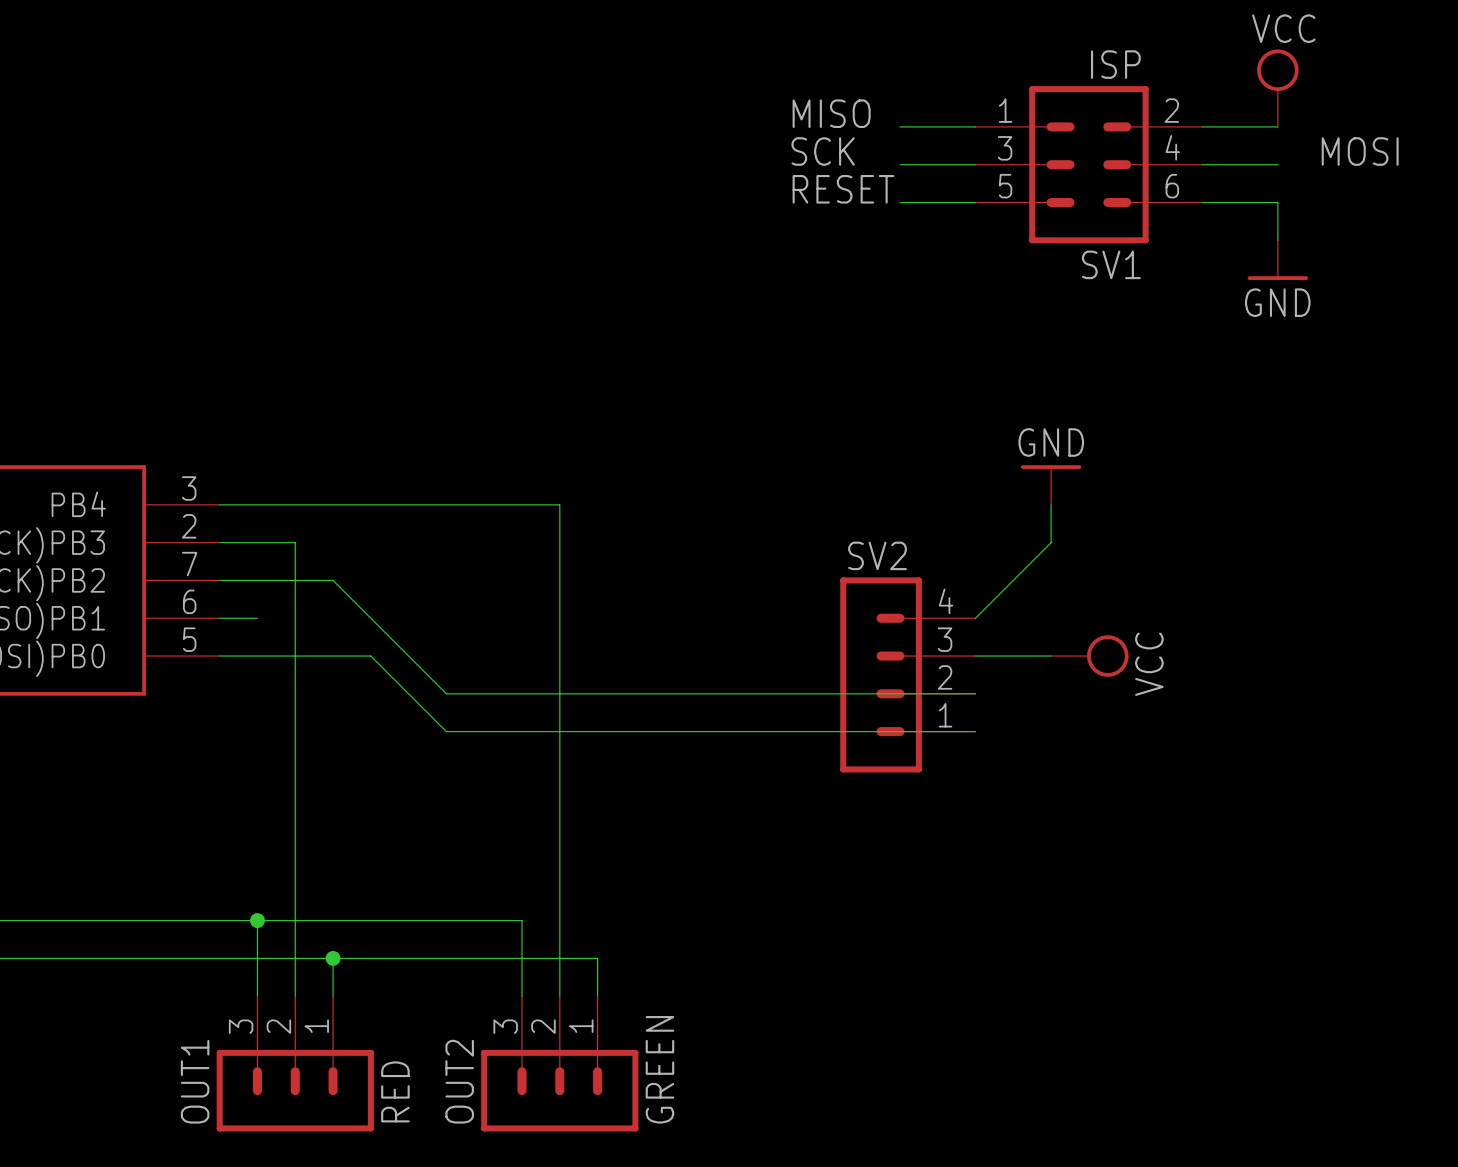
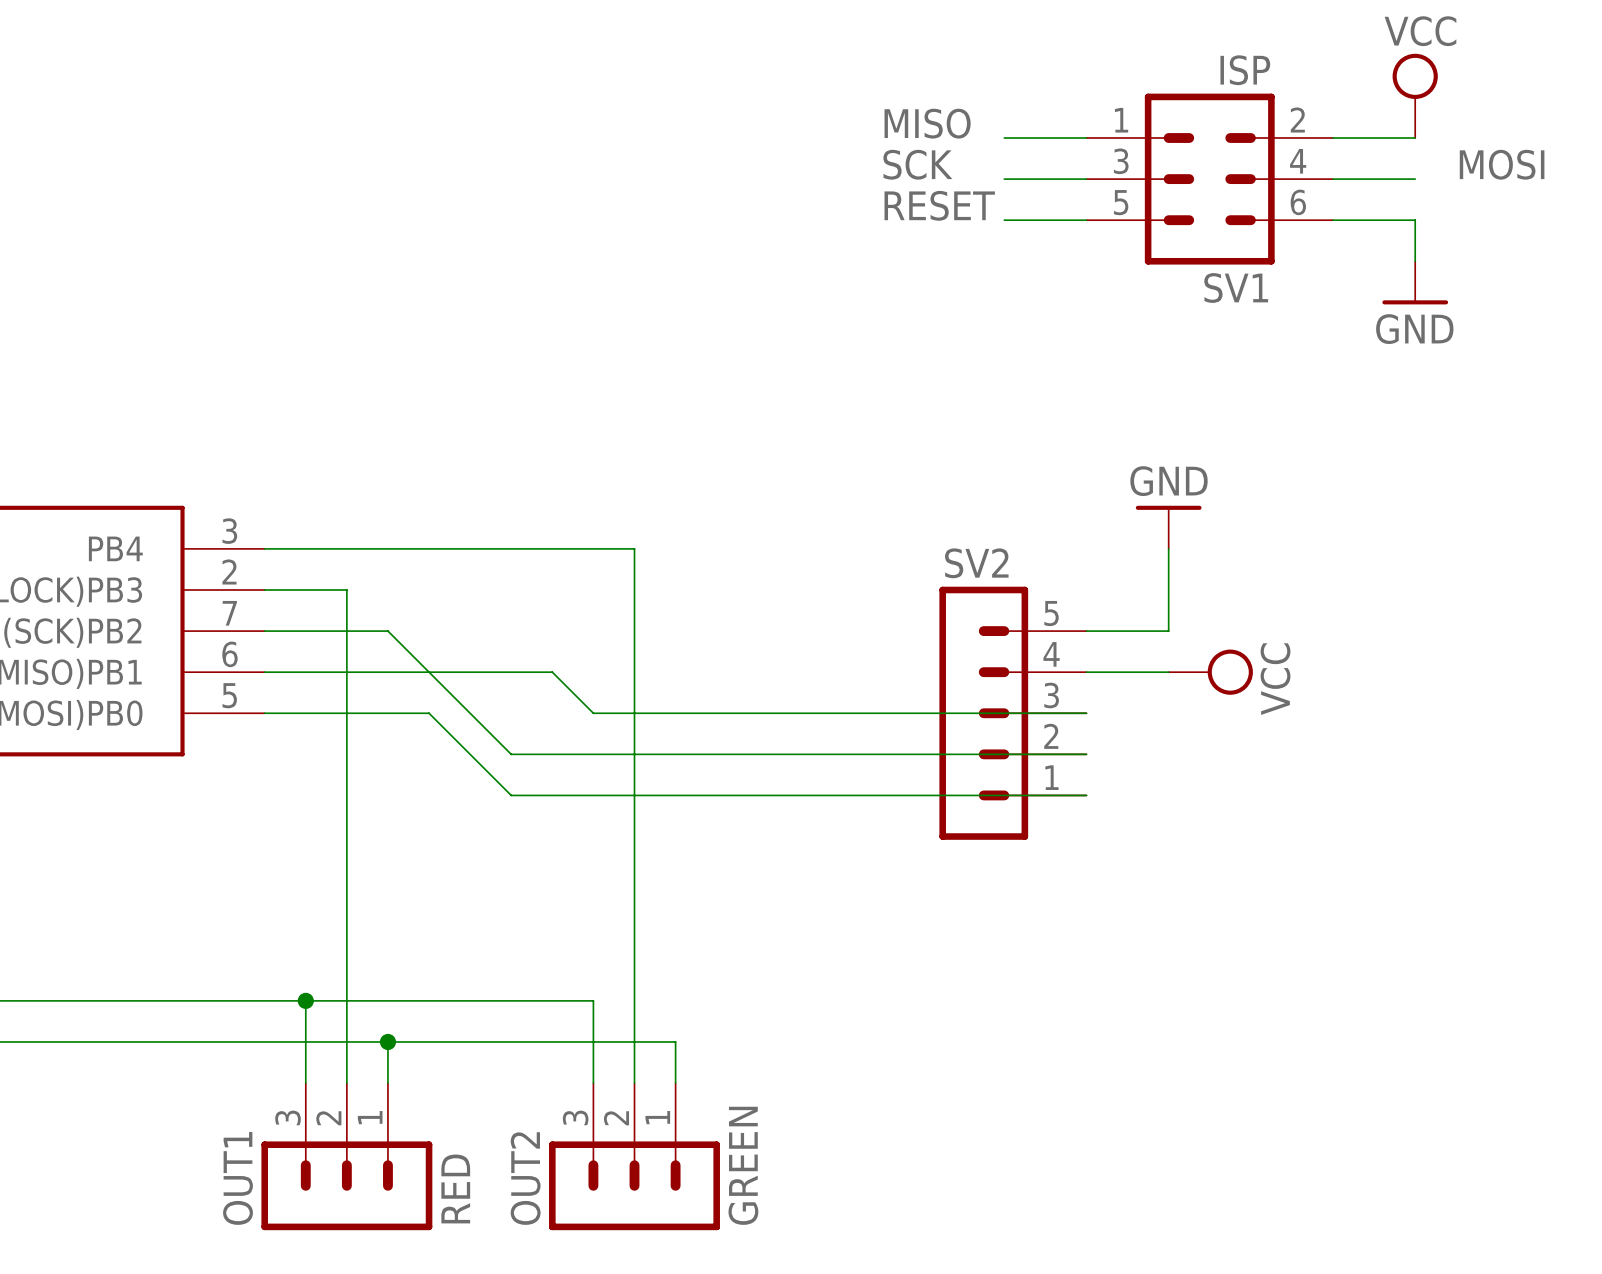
wire: (1051, 542) (975, 618) -> (1168, 589) (1168, 631) (1086, 631)
SV2 symbol: [840, 577, 976, 773] -> [939, 586, 1087, 840]
wire: none -> (1086, 672) (1168, 672)
wire: (975, 656) (1051, 656) -> (1086, 713) (593, 713) (552, 672) (305, 672)
power symbol position: VCC (1089, 656) -> VCC (1210, 672)

